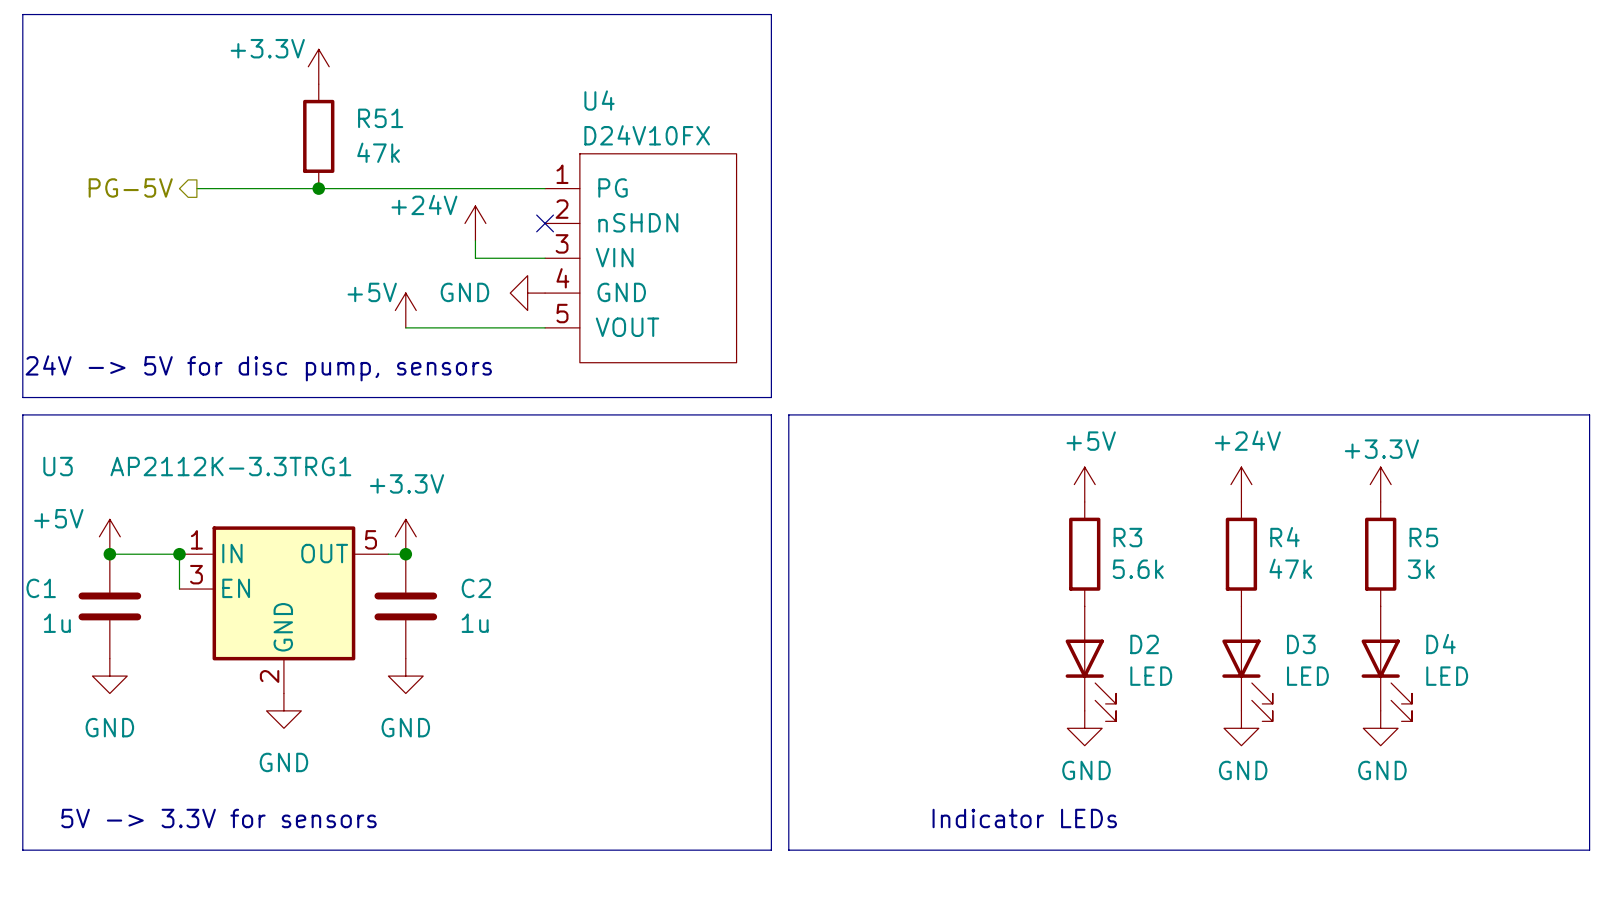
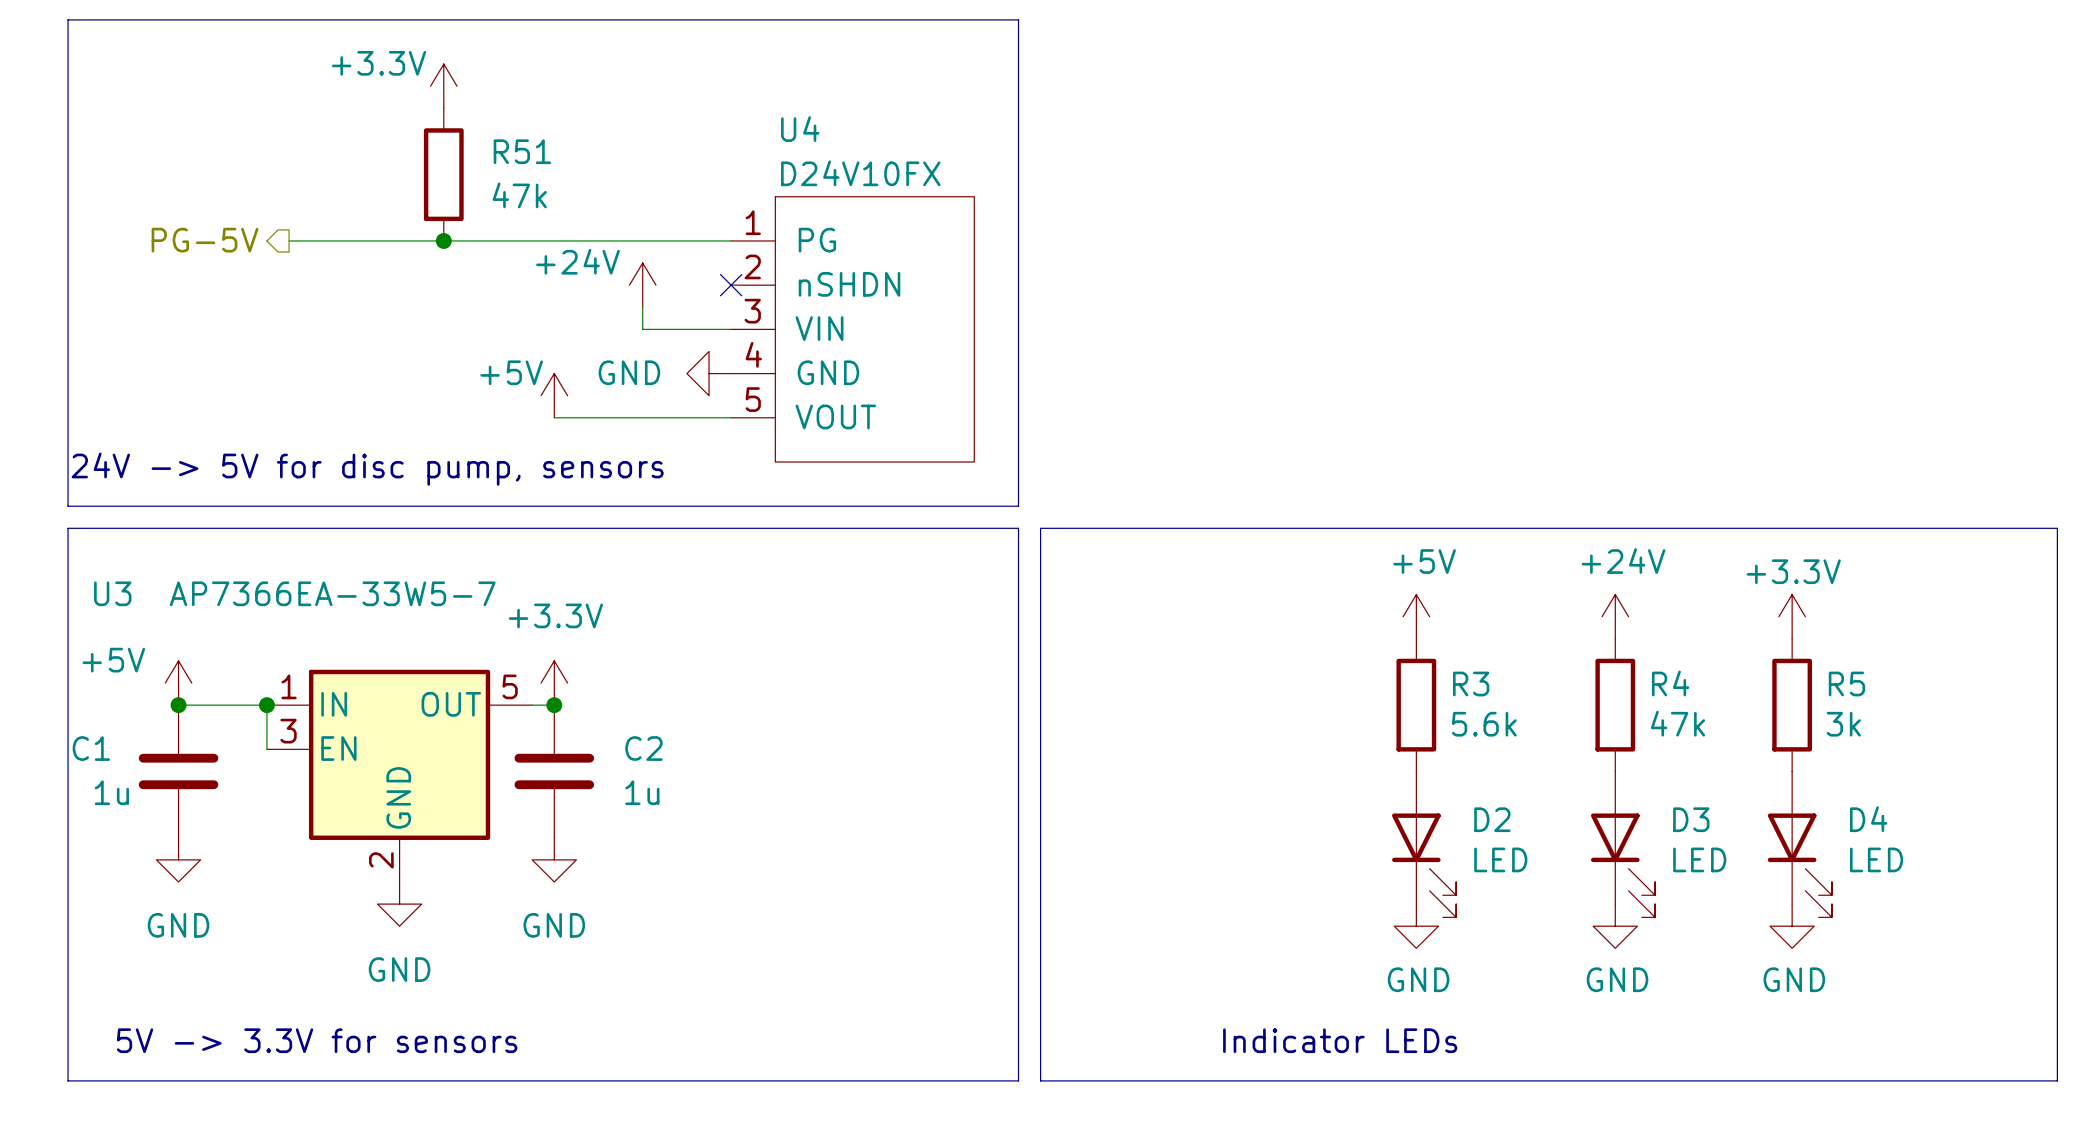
U3 value: AP2112K-3.3TRG1 (230, 466) -> AP7366EA-33W5-7 (332, 593)

